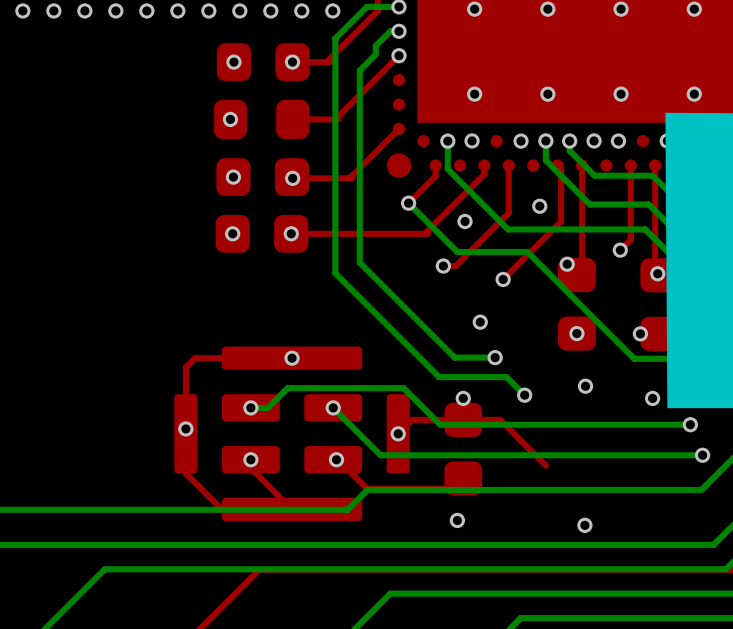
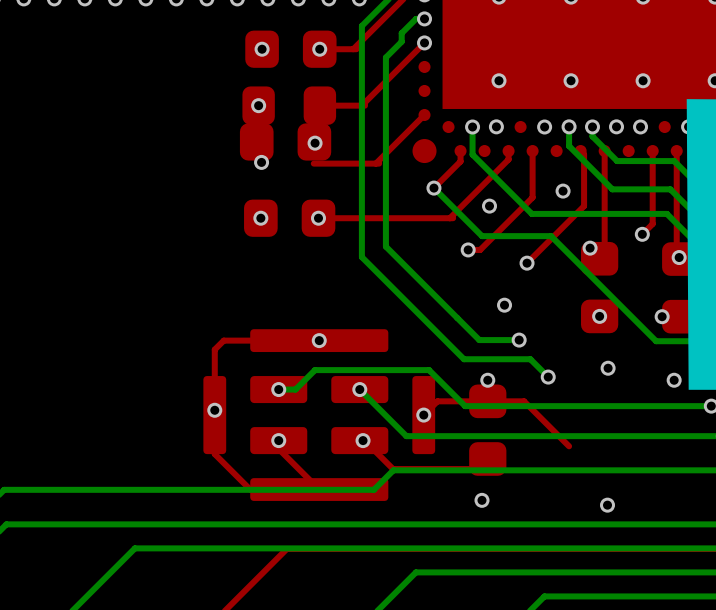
part position: (262, 177) -> (285, 141)
via position: (292, 178) -> (315, 143)

